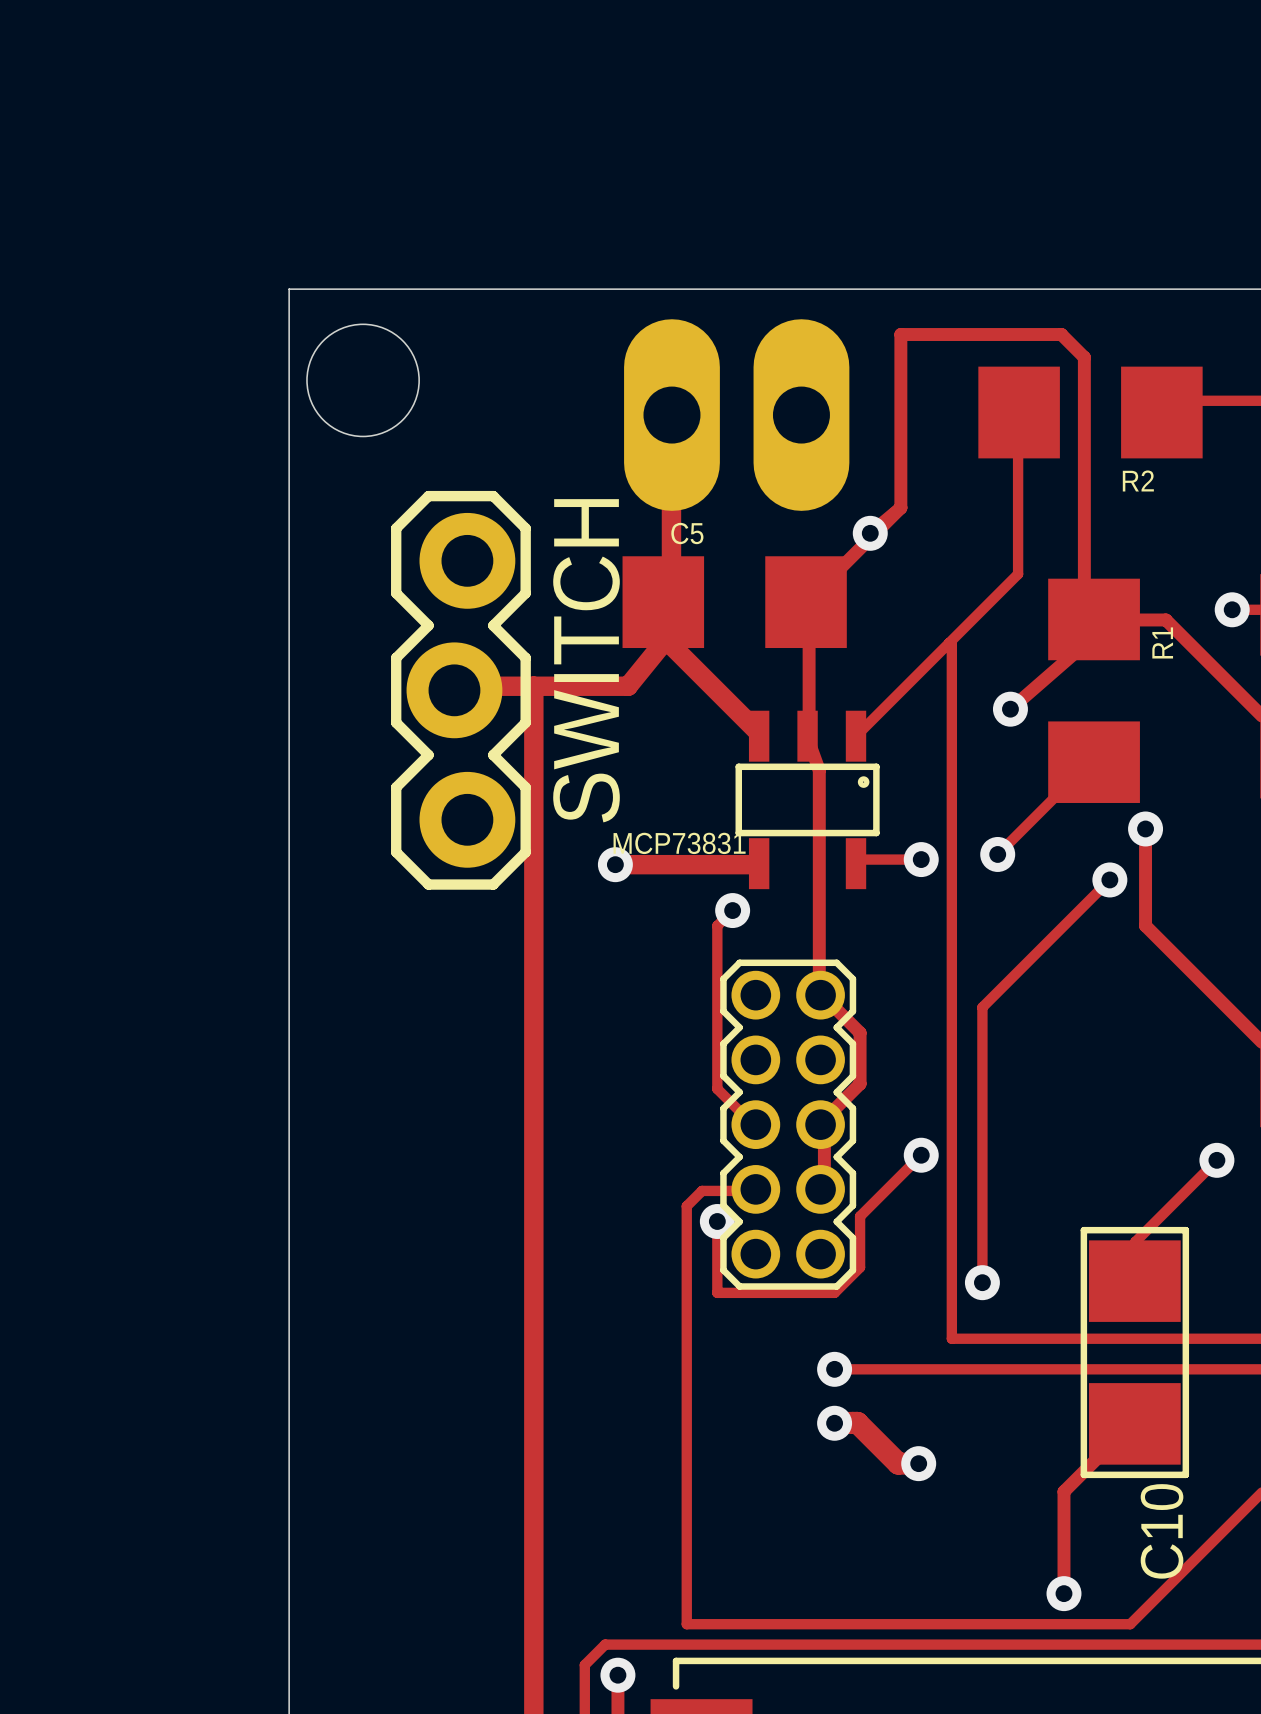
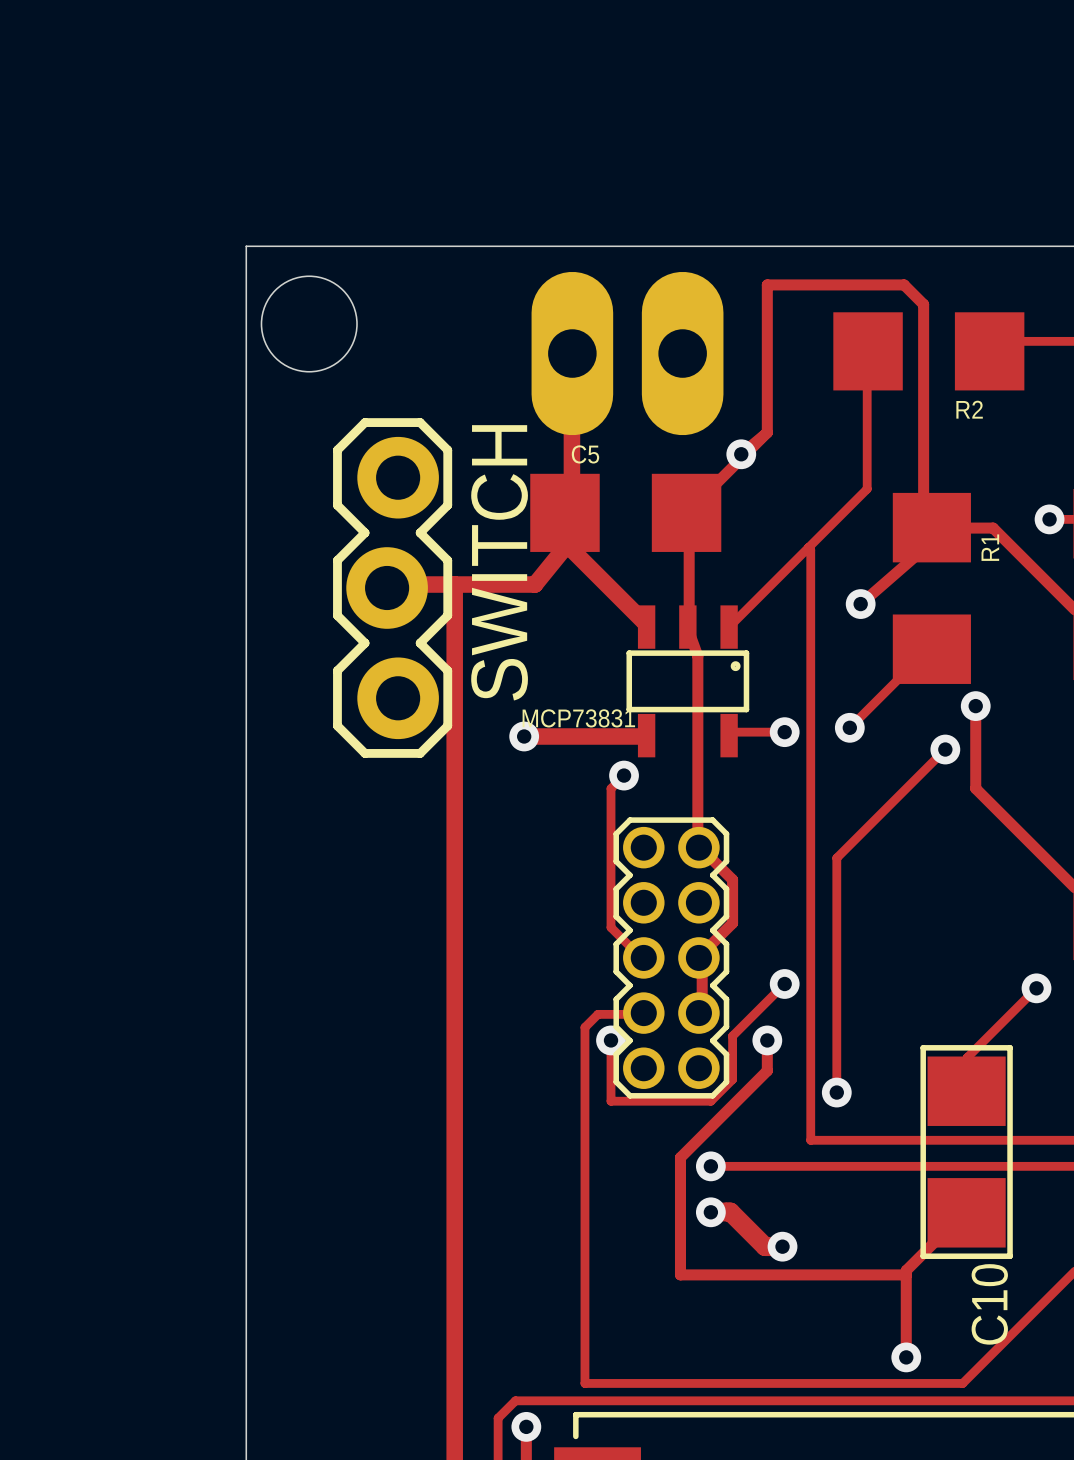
track: none -> (767, 1040) (767, 1070) (680, 1157) (680, 1274) (906, 1274)
via: none -> (767, 1040)

